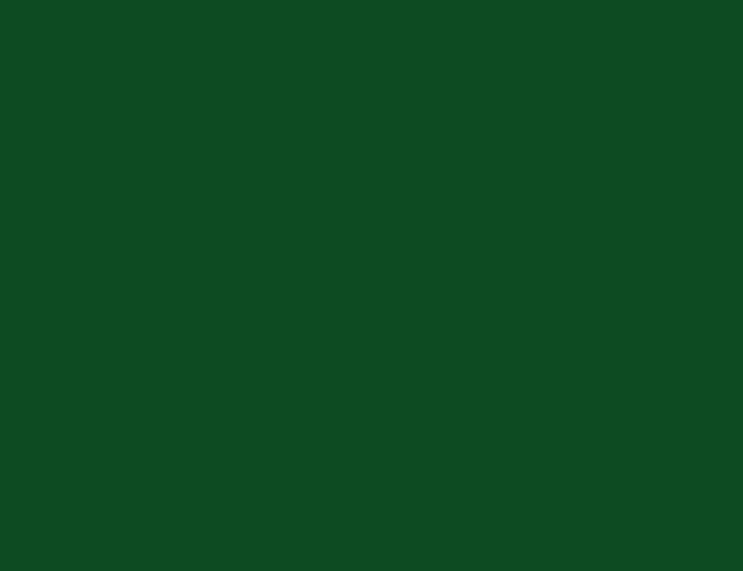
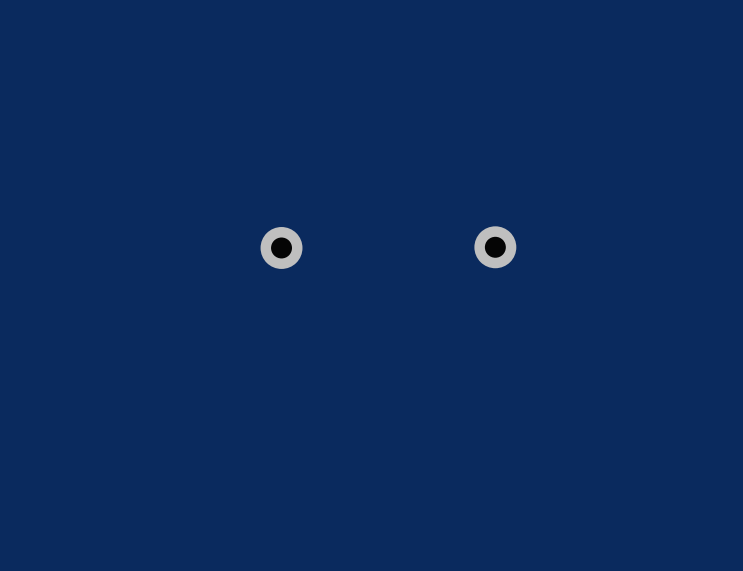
via: none -> (281, 247)
via: none -> (495, 247)

